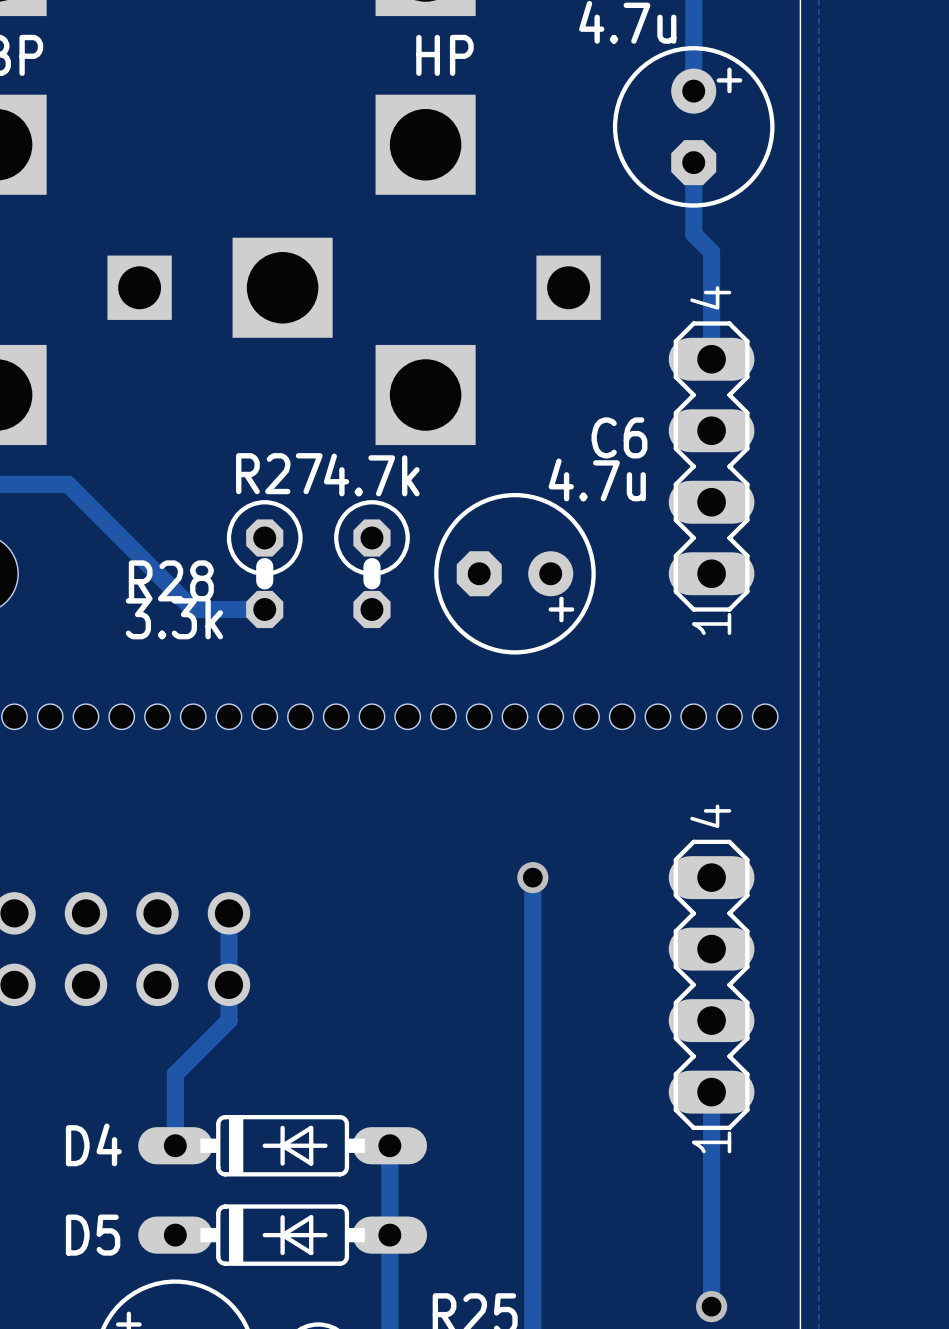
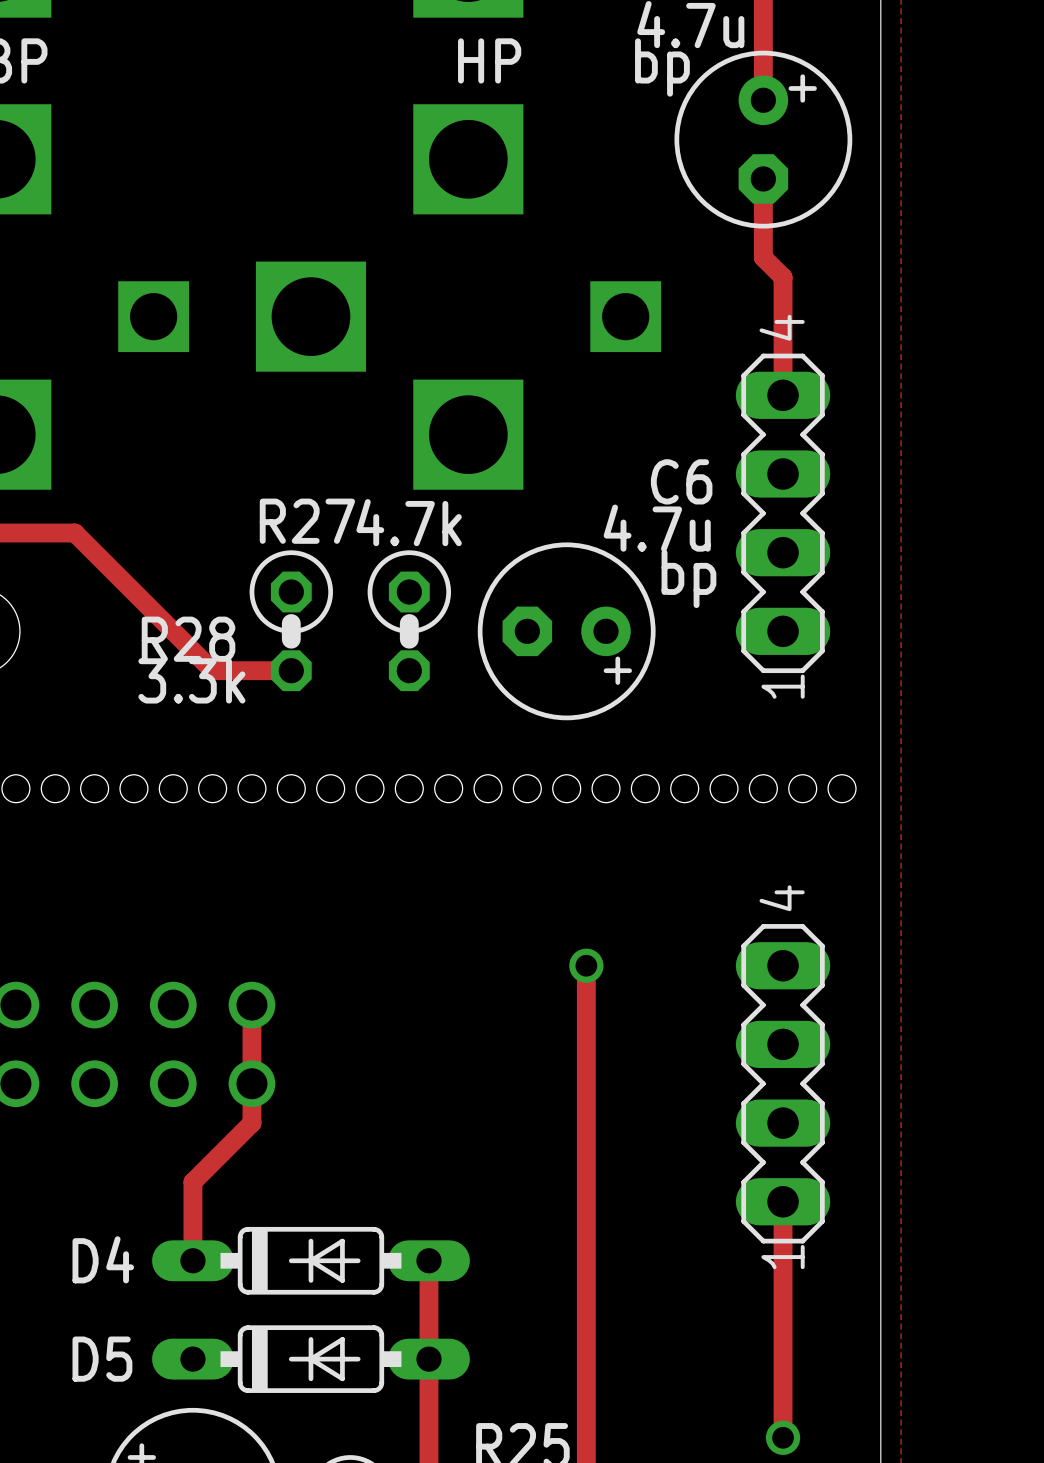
text: none -> bp (662, 67)
text: none -> bp (688, 578)

